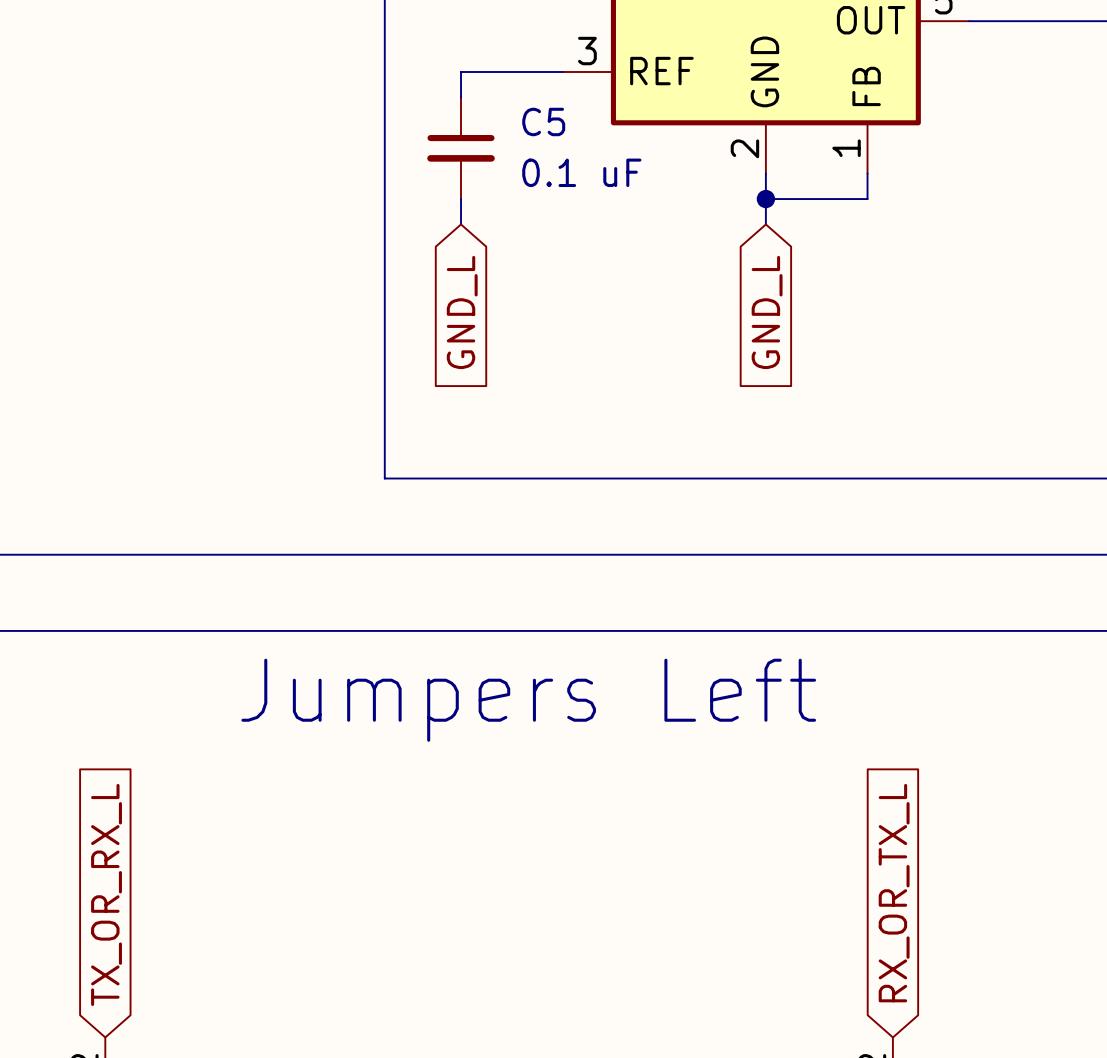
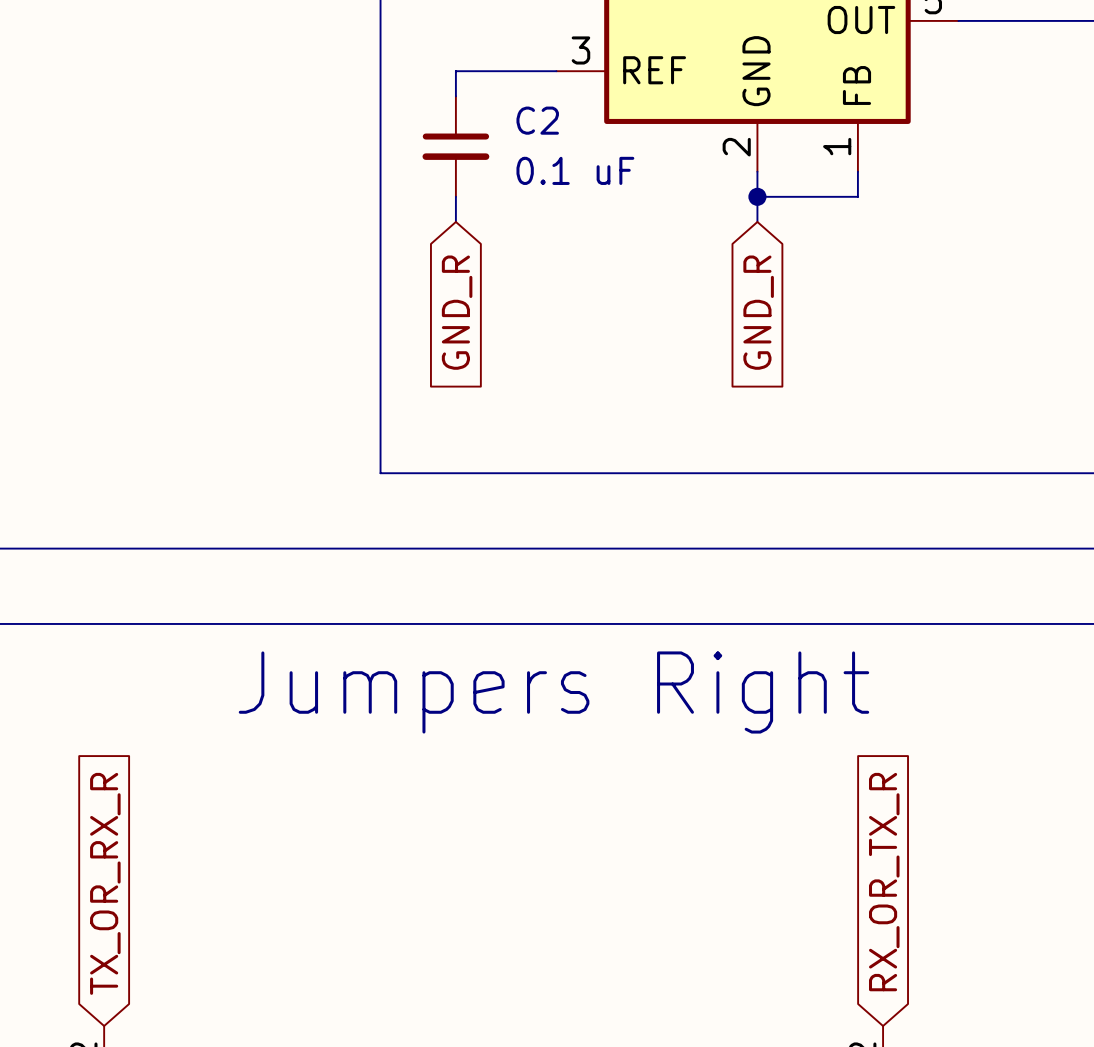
C5 name: C5 (543, 121) -> C2 (537, 120)
global label: GND_L (462, 312) -> GND_R (457, 312)
global label: GND_L (767, 312) -> GND_R (758, 312)
text: Jumpers Left (528, 700) -> Jumpers Right (553, 692)
global label: RX_OR_TX_L (894, 893) -> RX_OR_TX_R (884, 882)
global label: TX_OR_RX_L (106, 894) -> TX_OR_RX_R (105, 883)

